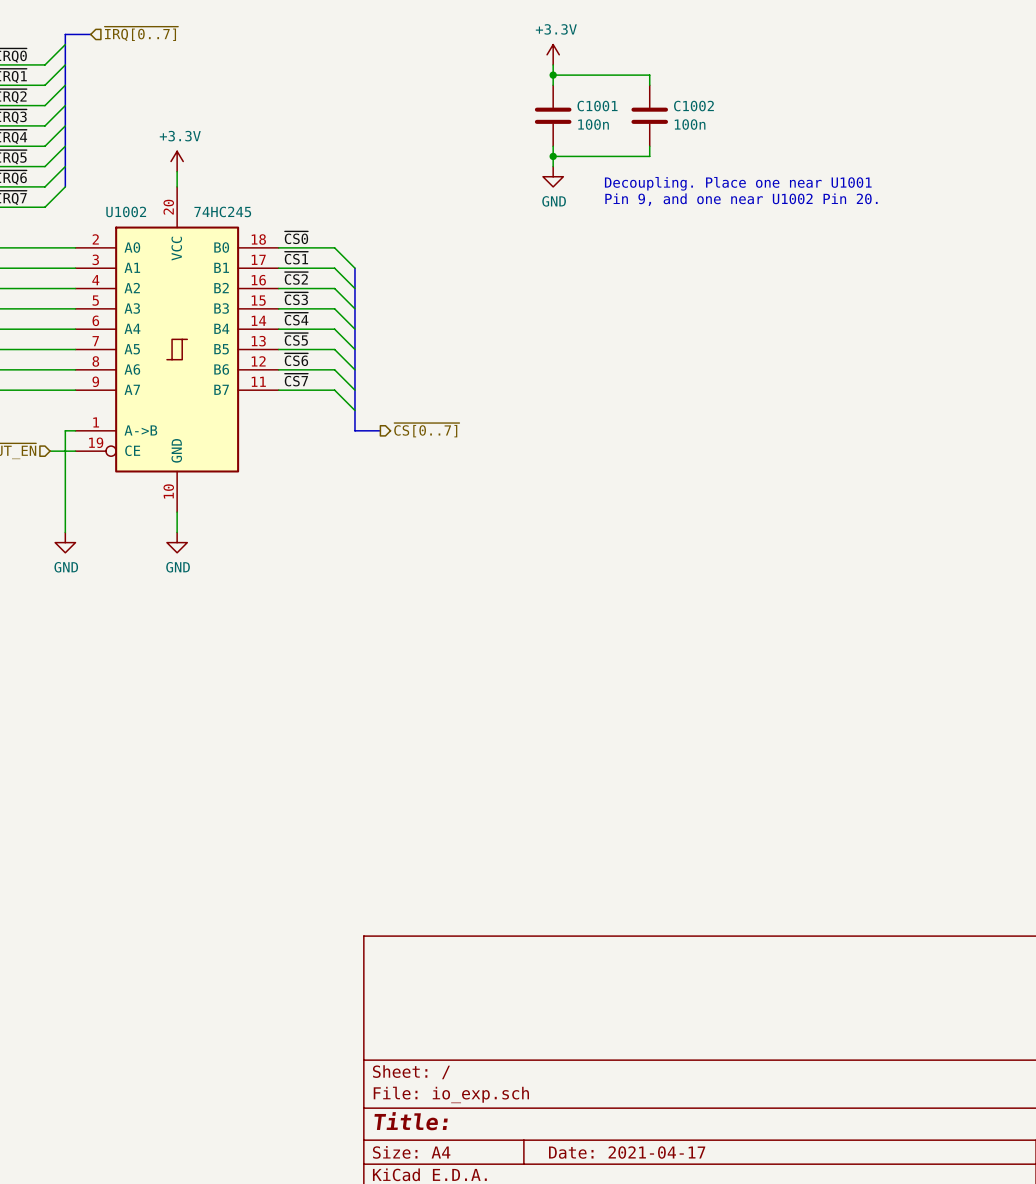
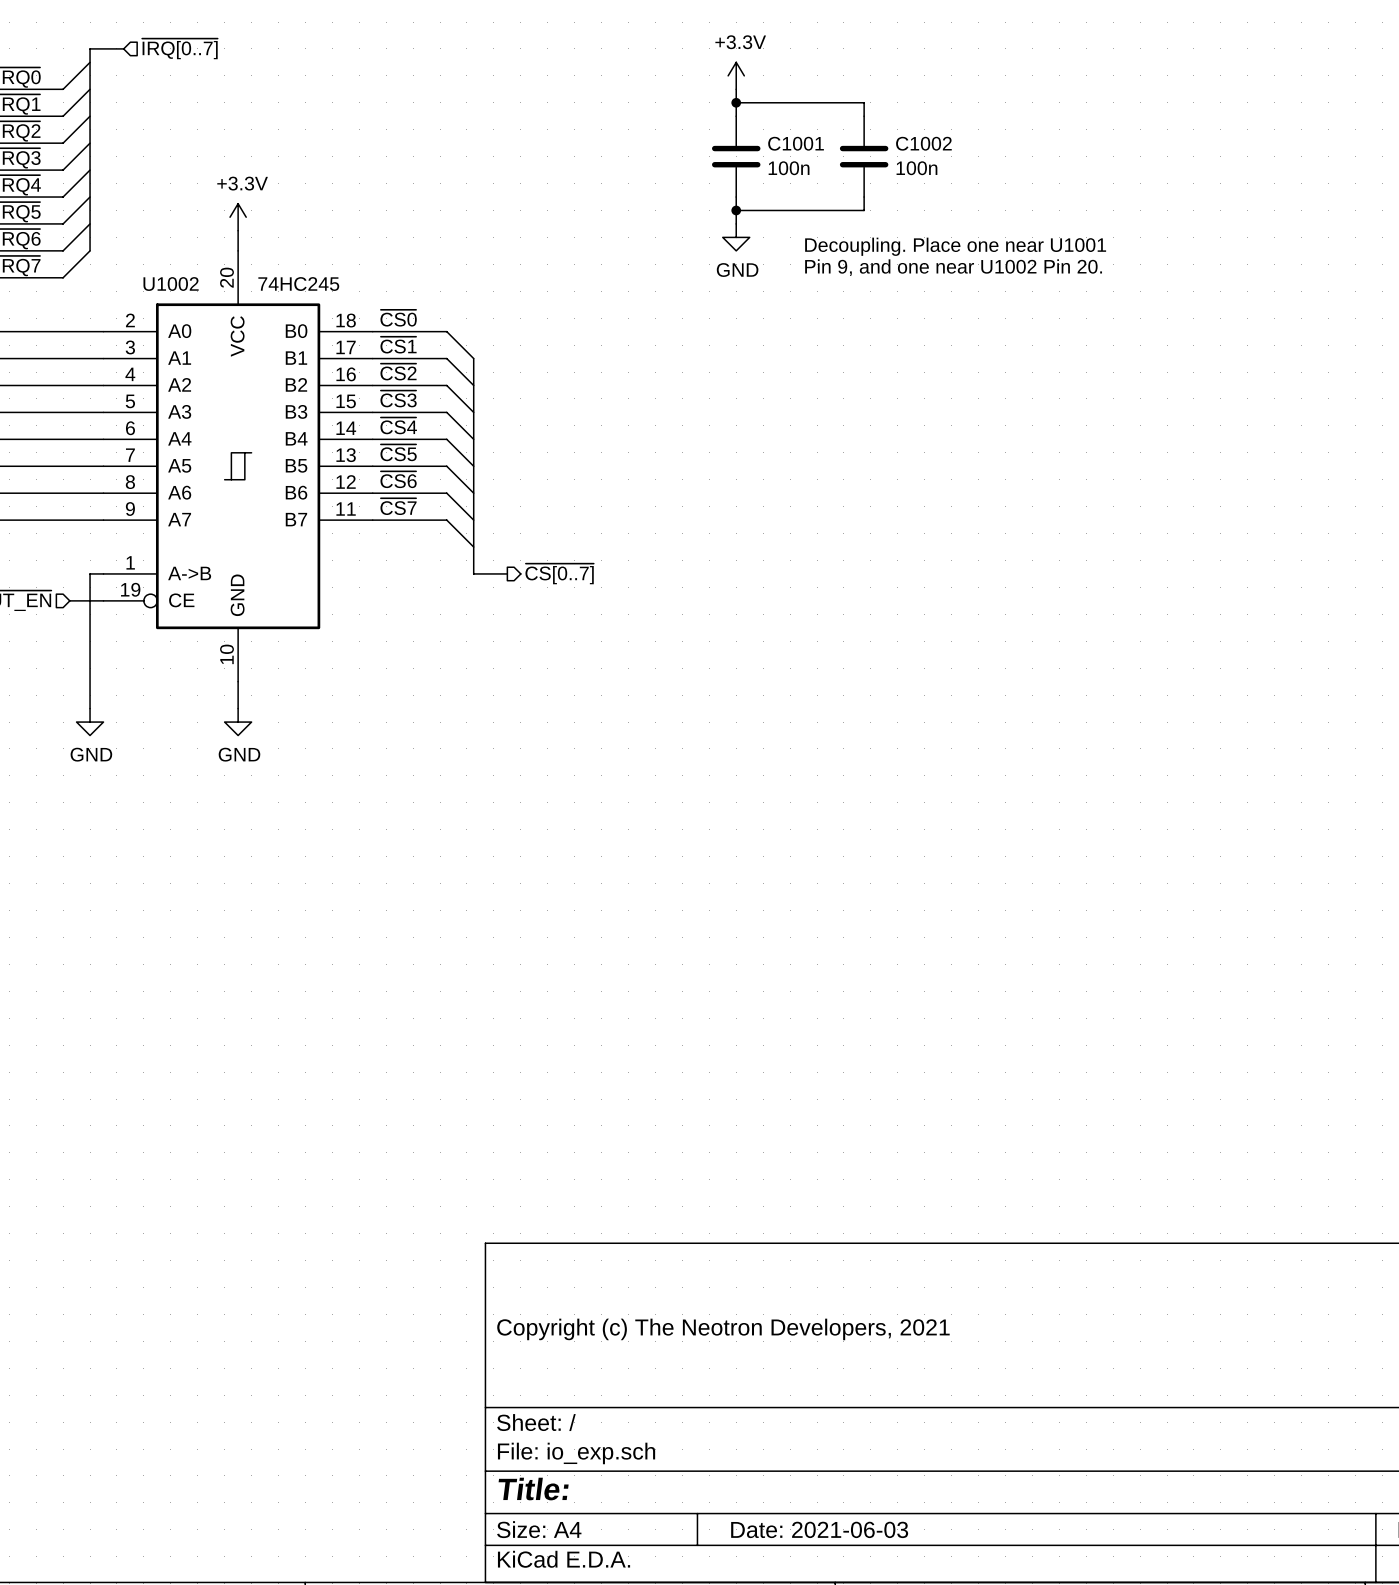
title block: none -> Copyright (c) The Neotron Developers, 2021 (723, 1329)
title block: Date: 2021-04-17 (627, 1152) -> Date: 2021-06-03 (819, 1529)

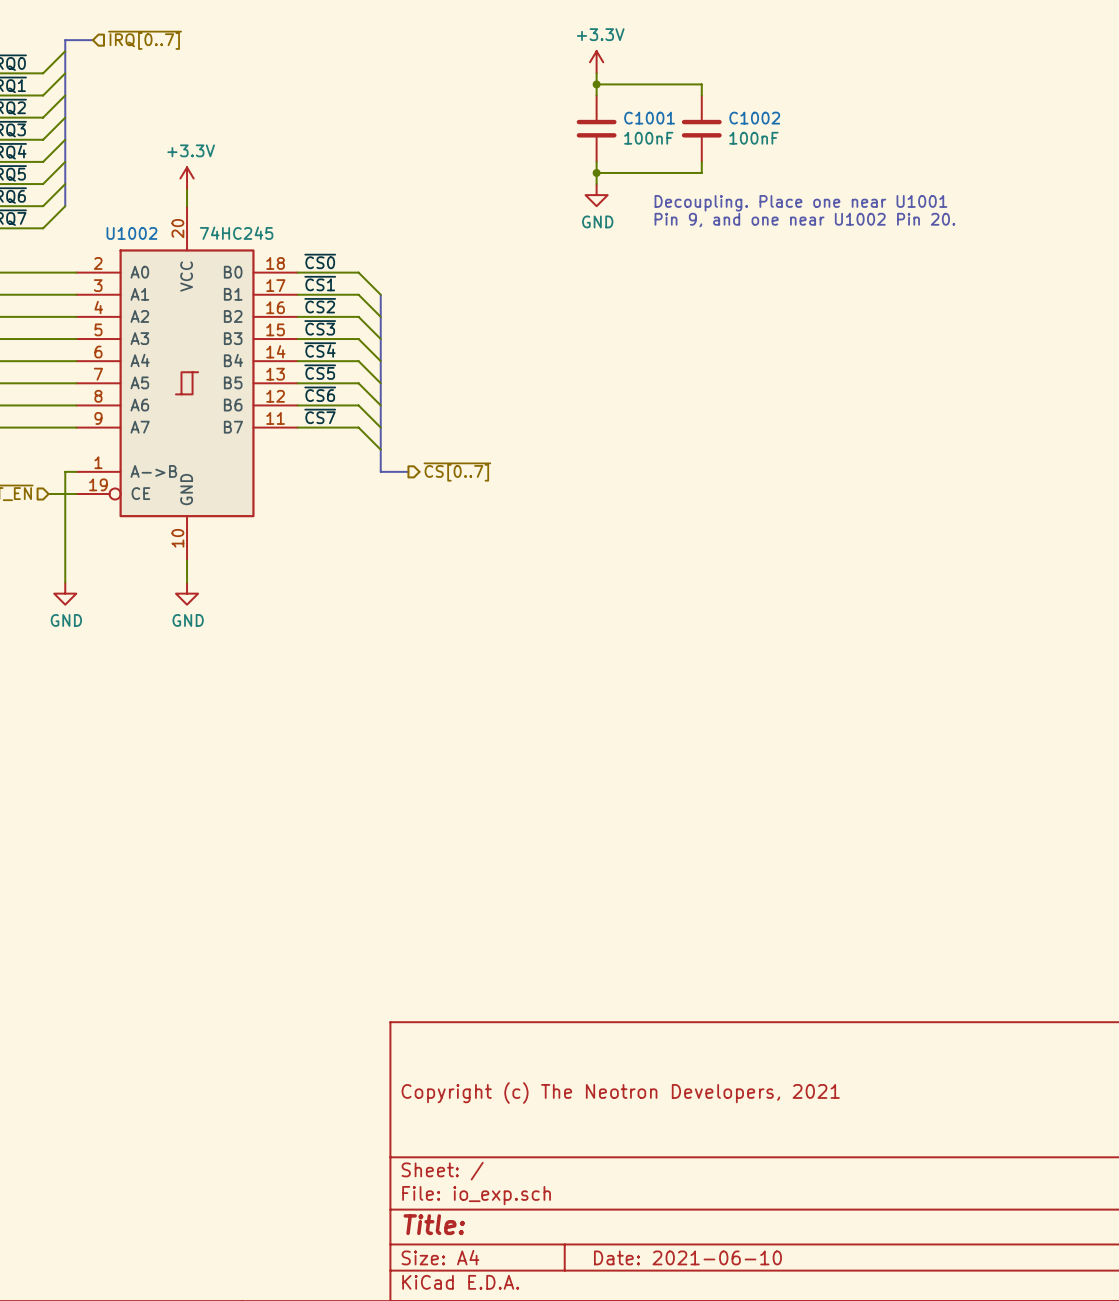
C1001 value: 100n (789, 168) -> 100nF (648, 138)
C1002 value: 100n (916, 168) -> 100nF (753, 138)
title block: Date: 2021-06-03 (819, 1529) -> Date: 2021-06-10 (687, 1257)

